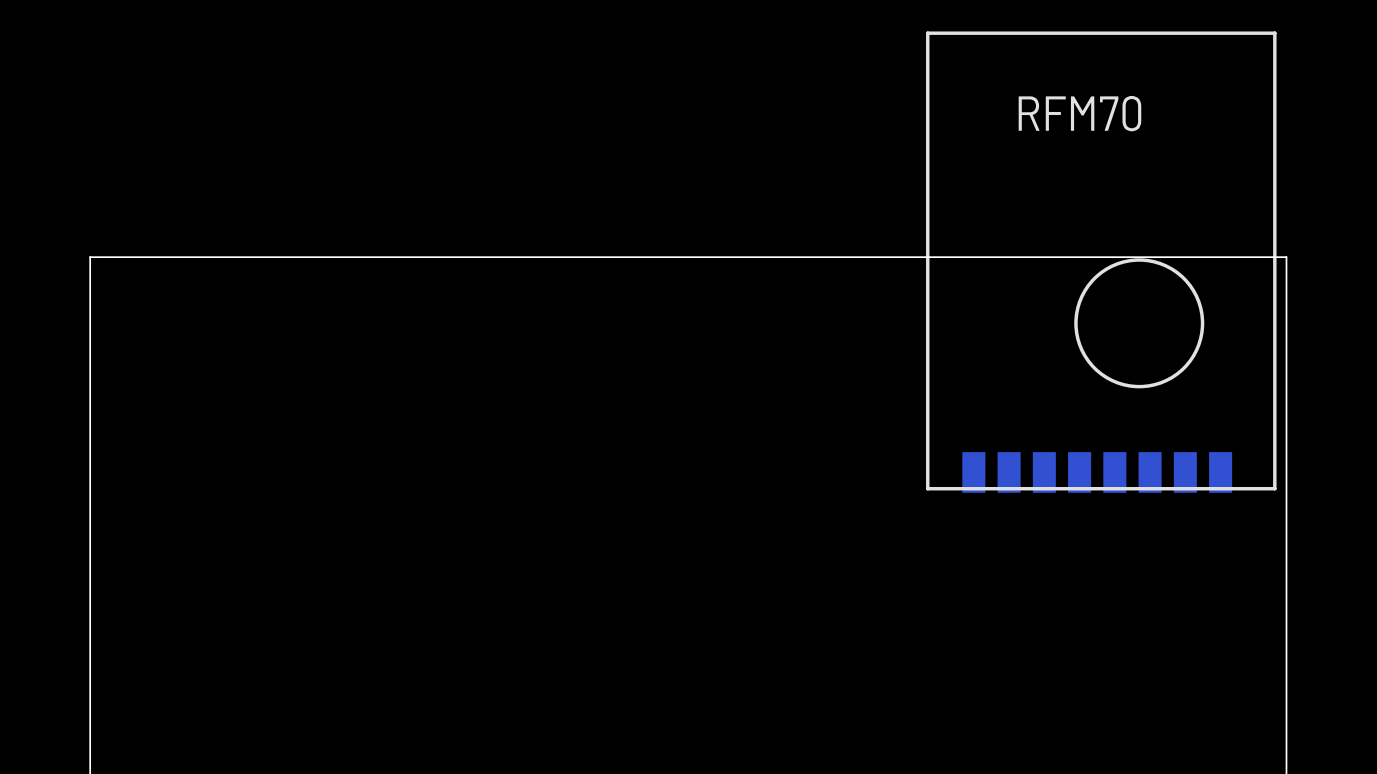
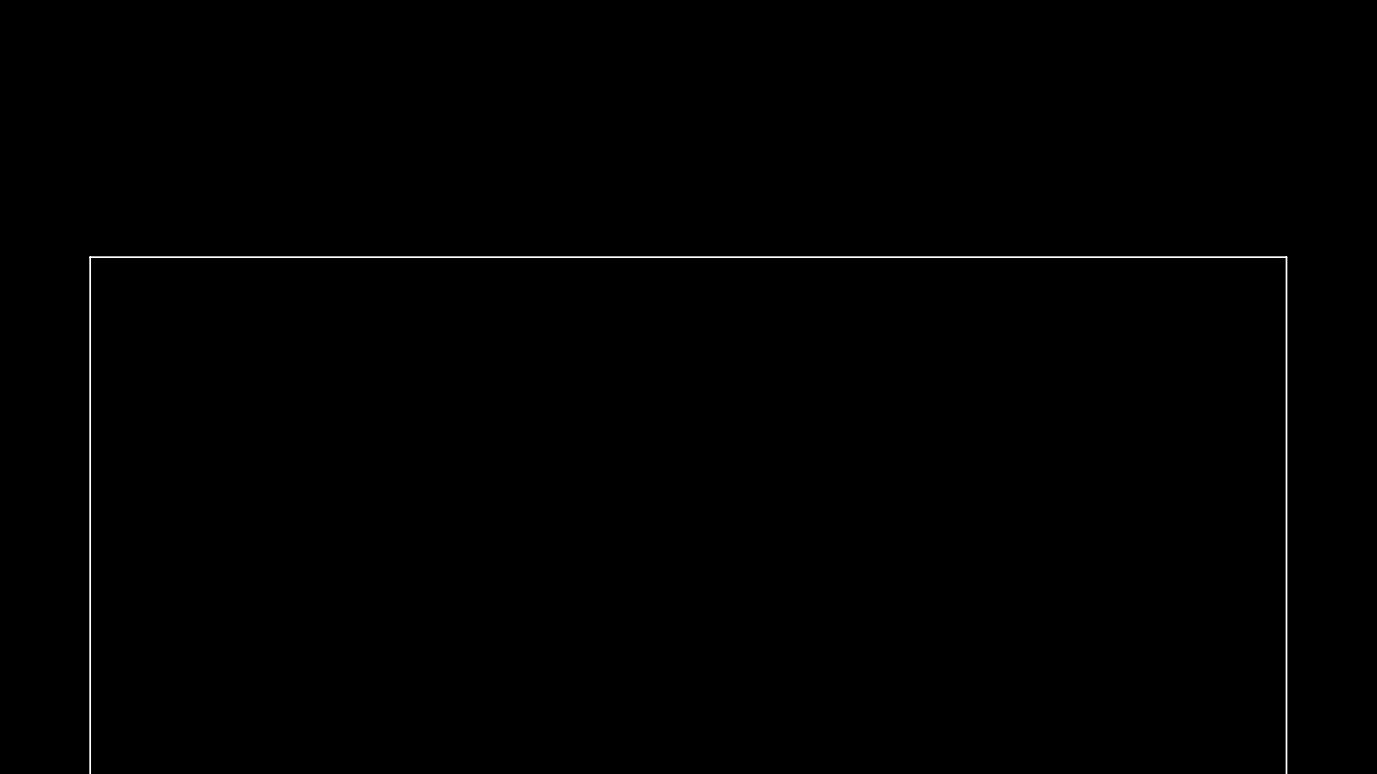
part: (1101, 262) -> none

